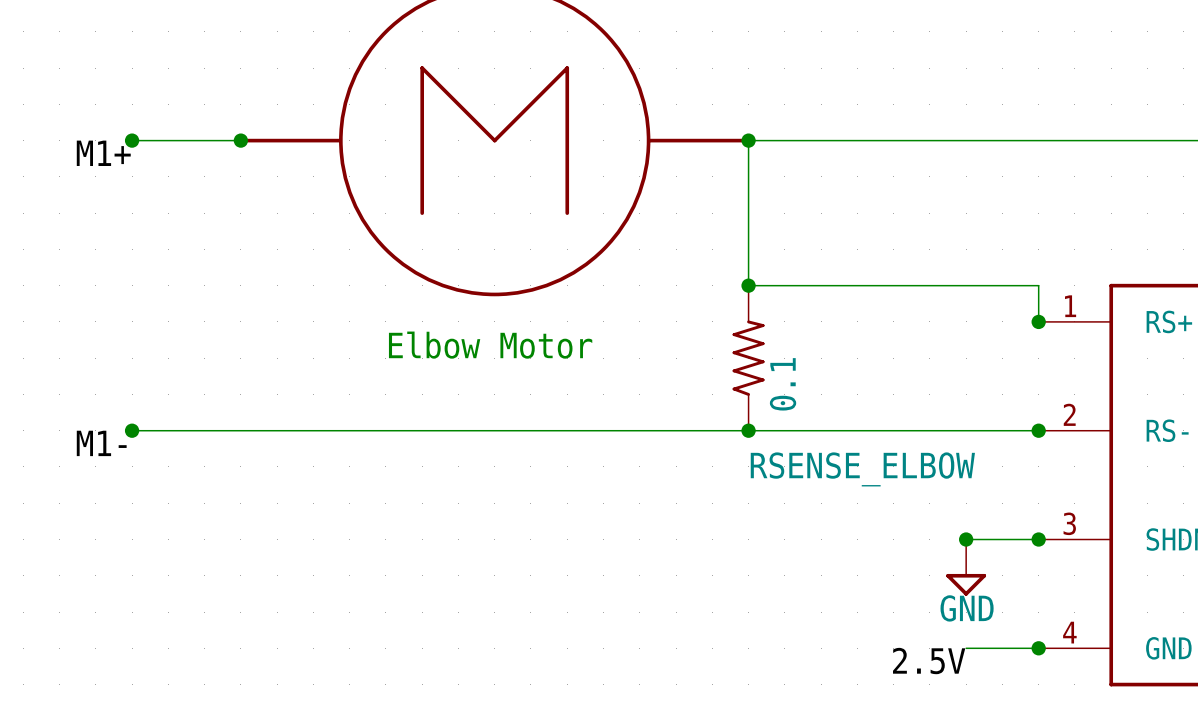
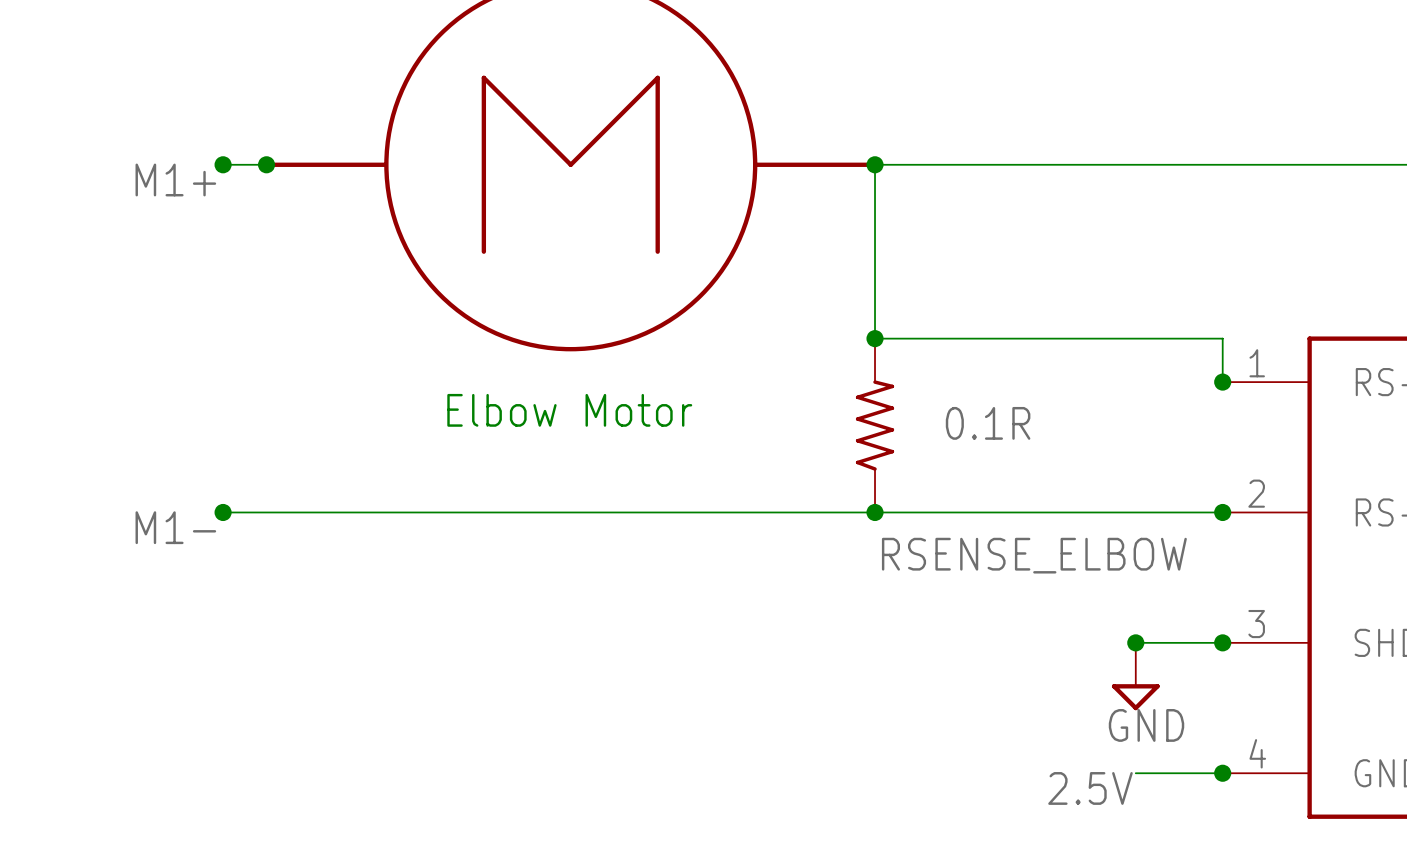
wire: (132, 140) (204, 140) -> none
junction position: (132, 140) -> (223, 164)
label position: M1+ (103, 153) -> M1+ (175, 179)
RSENSE_ELBOW value: 0.1 (783, 384) -> 0.1R (988, 423)
wire: (132, 430) (204, 430) -> none
junction position: (132, 430) -> (223, 512)
label position: M1- (101, 443) -> M1- (175, 527)

